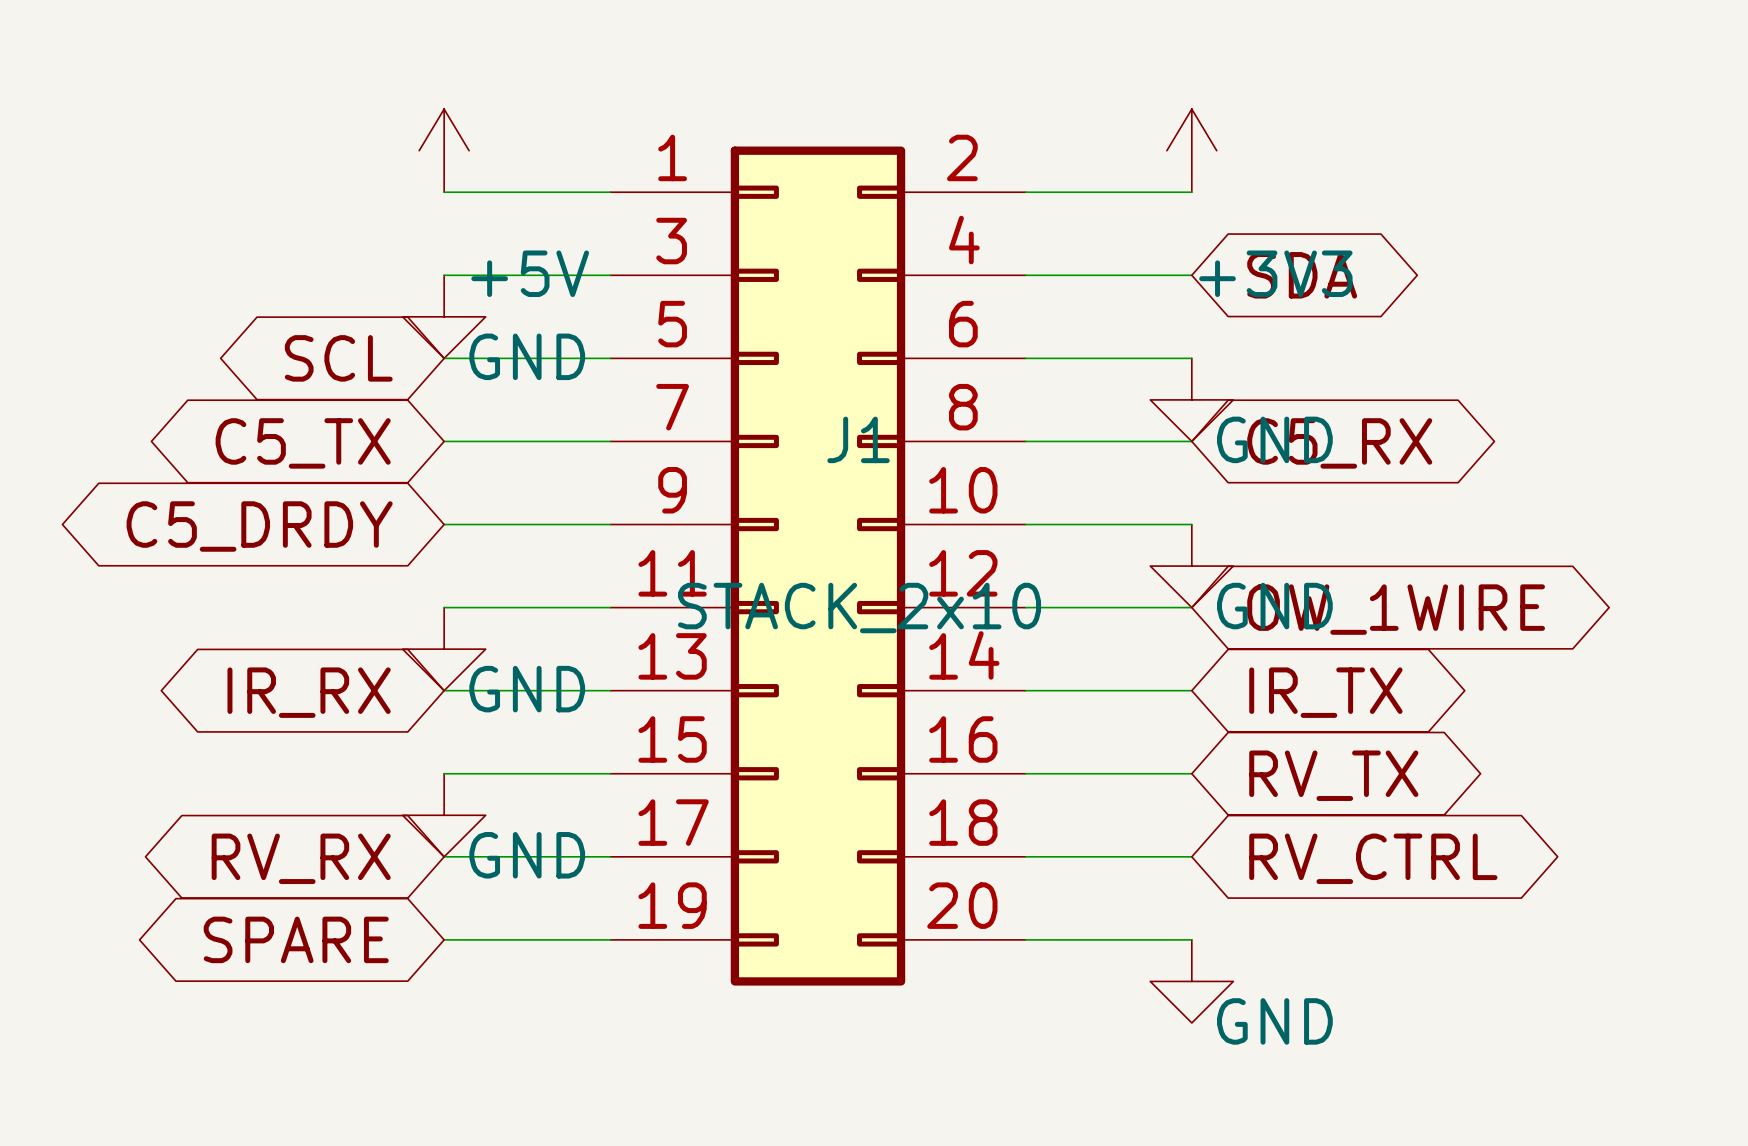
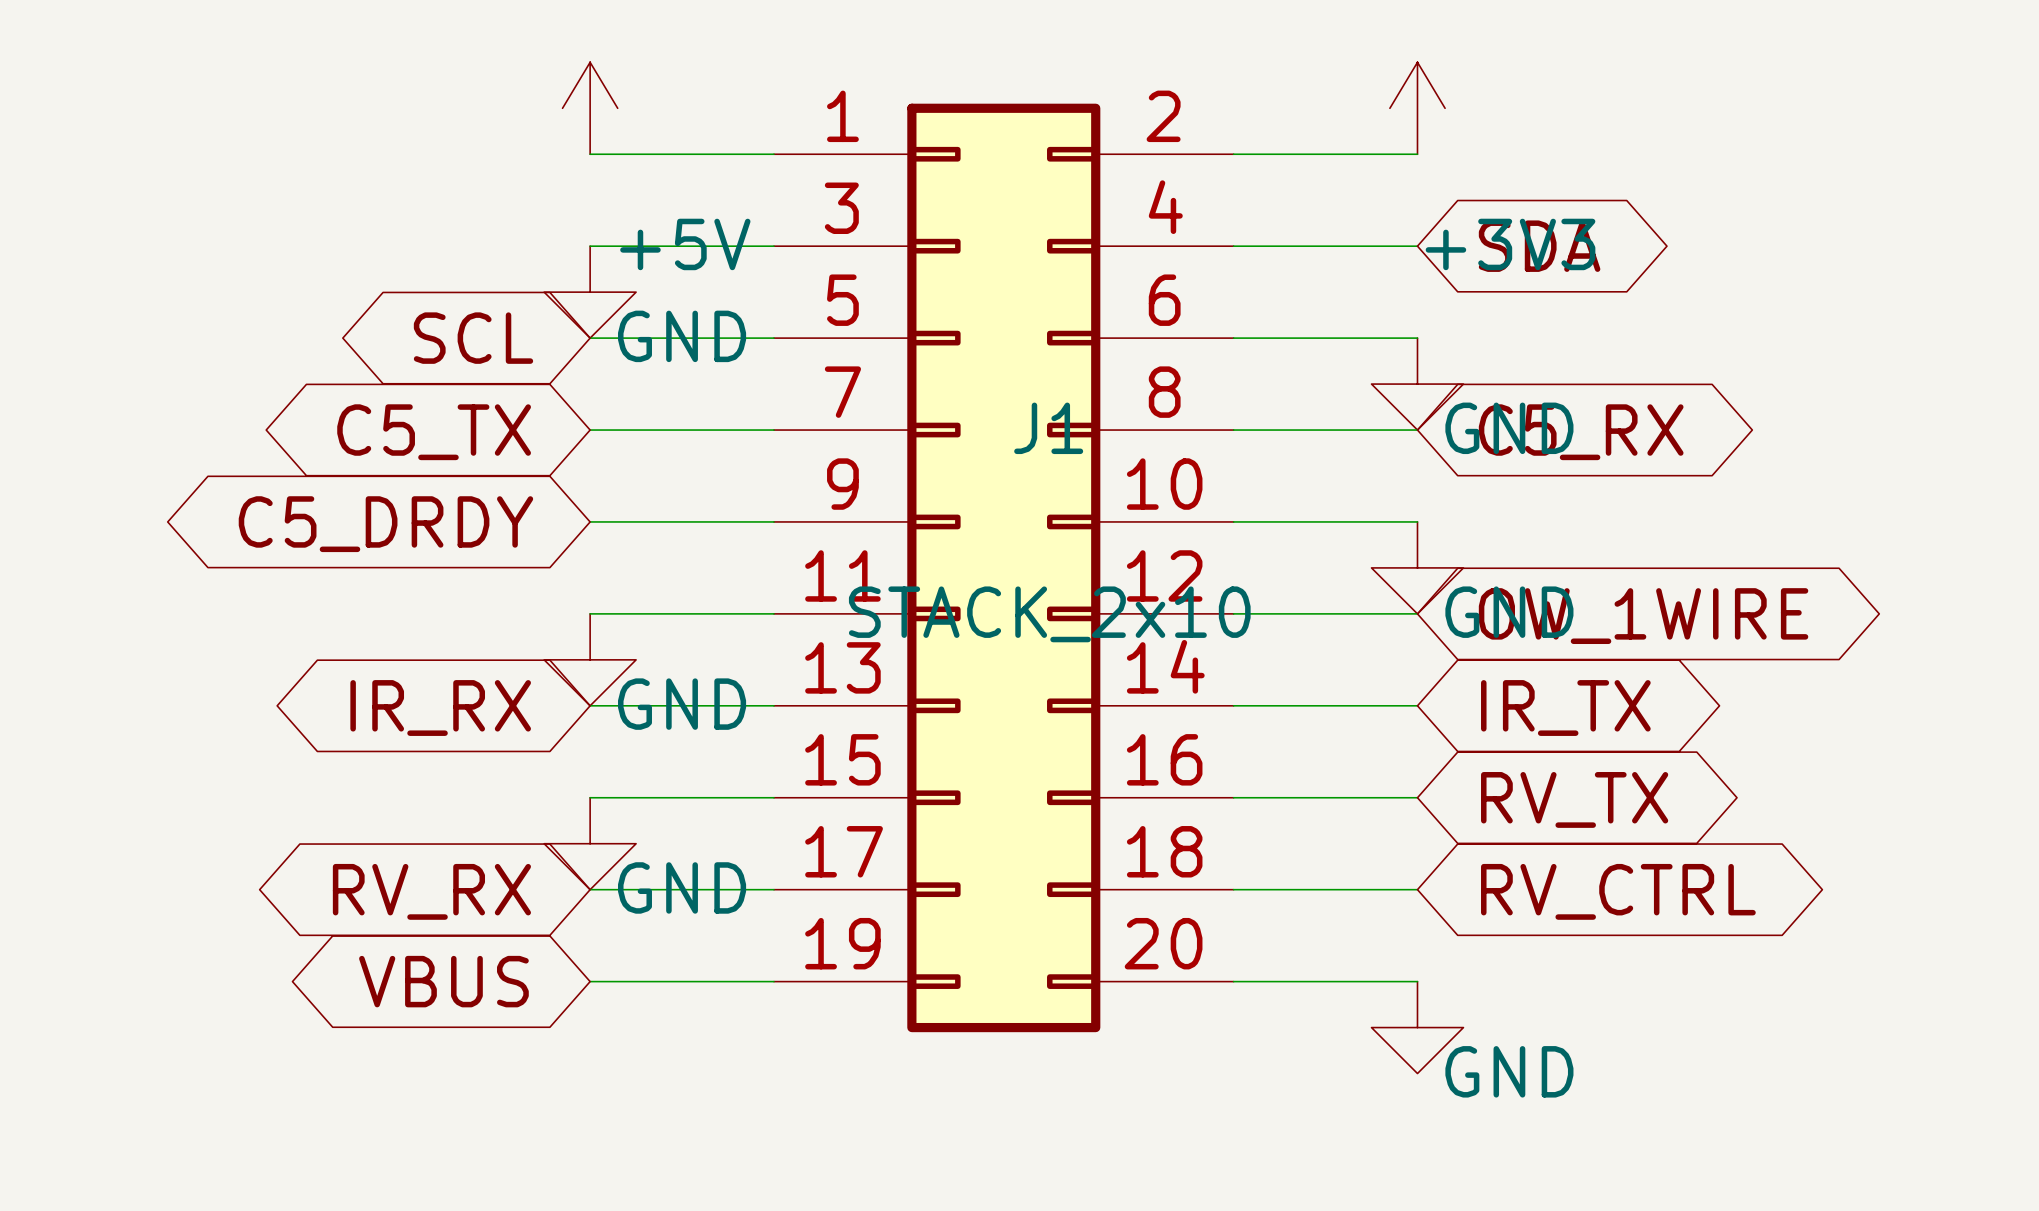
global label: SPARE (296, 939) -> VBUS (443, 981)

